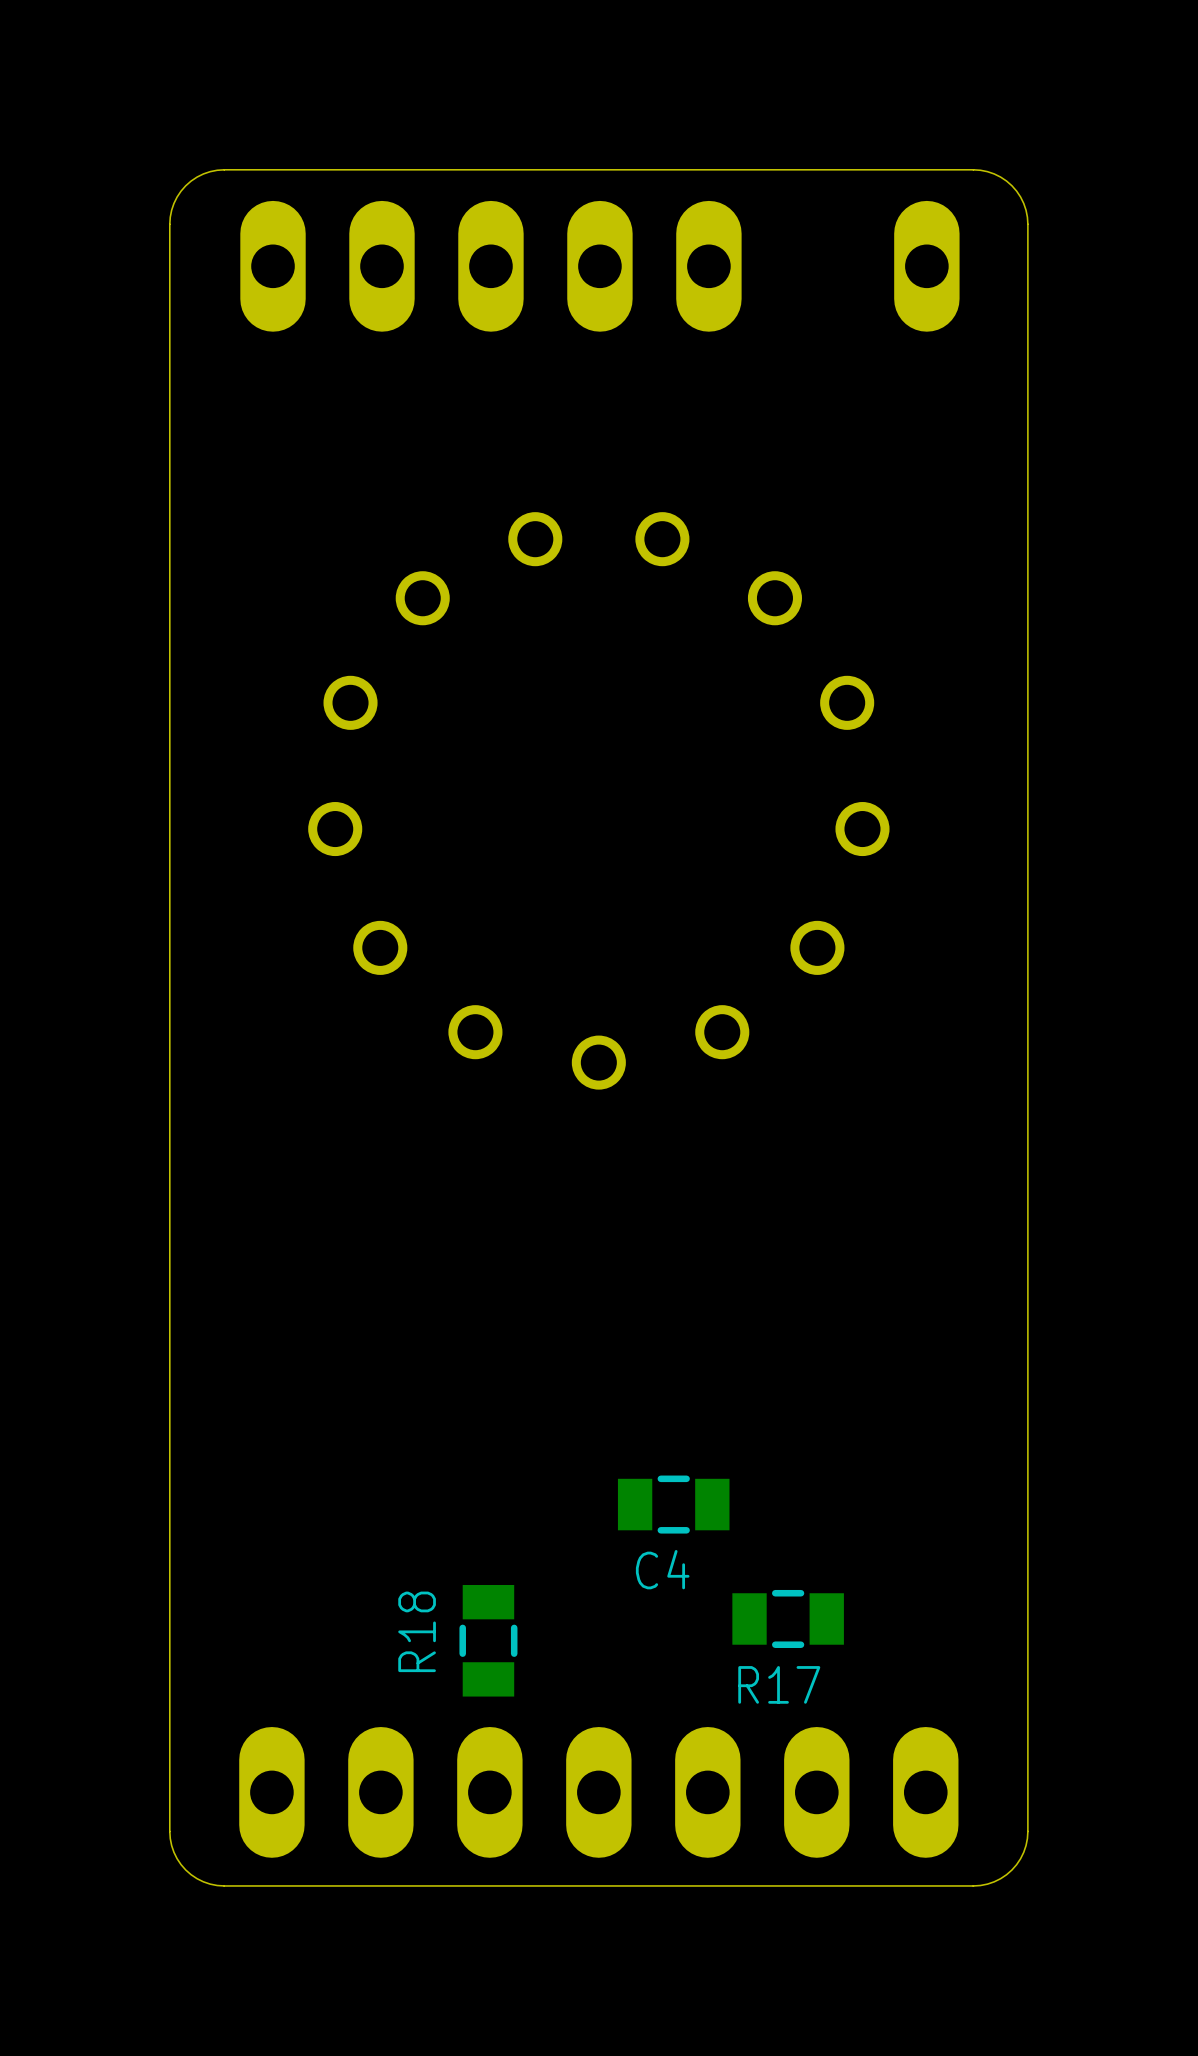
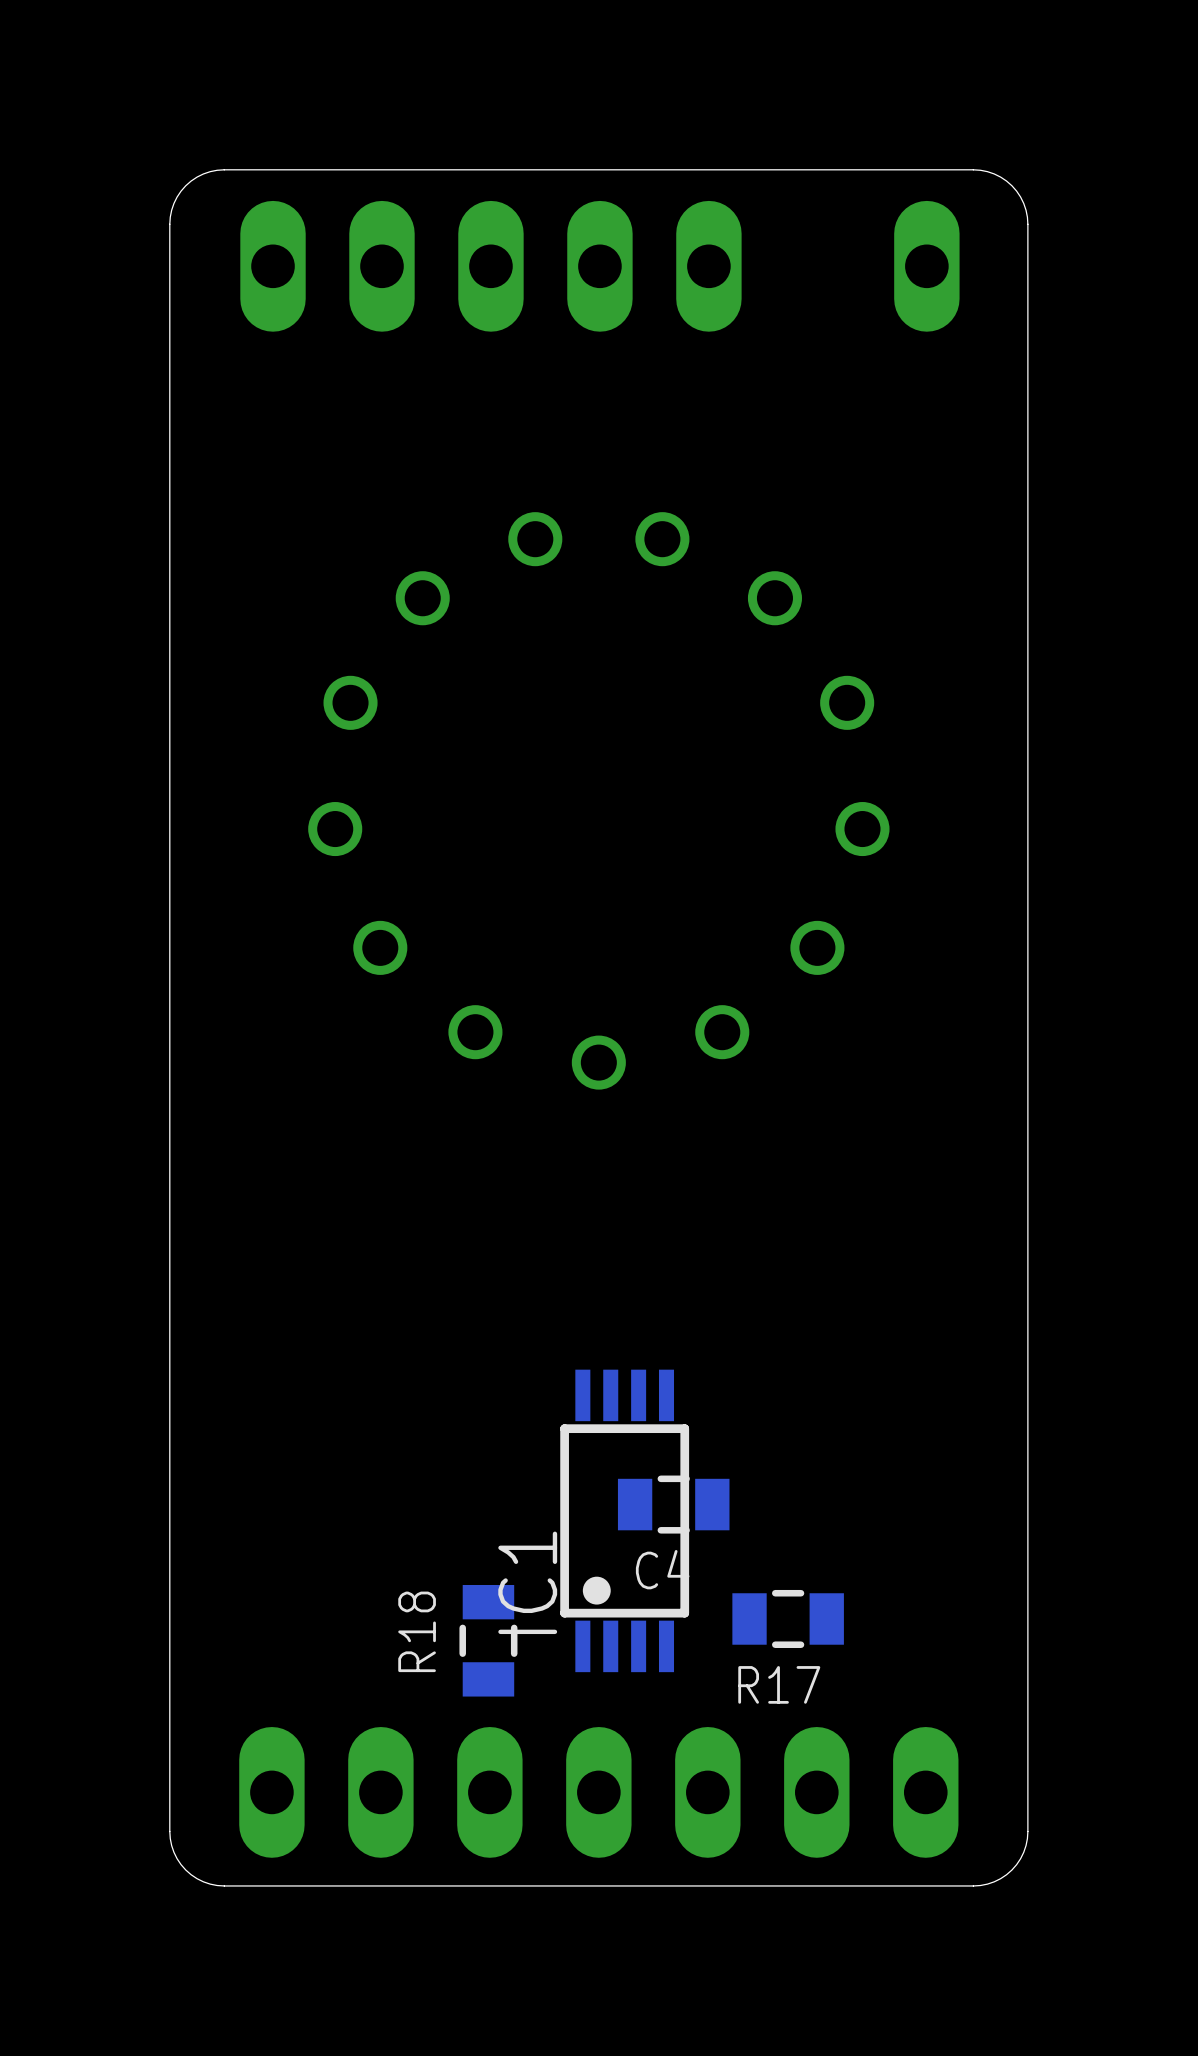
IC1: none -> (624, 1520)

